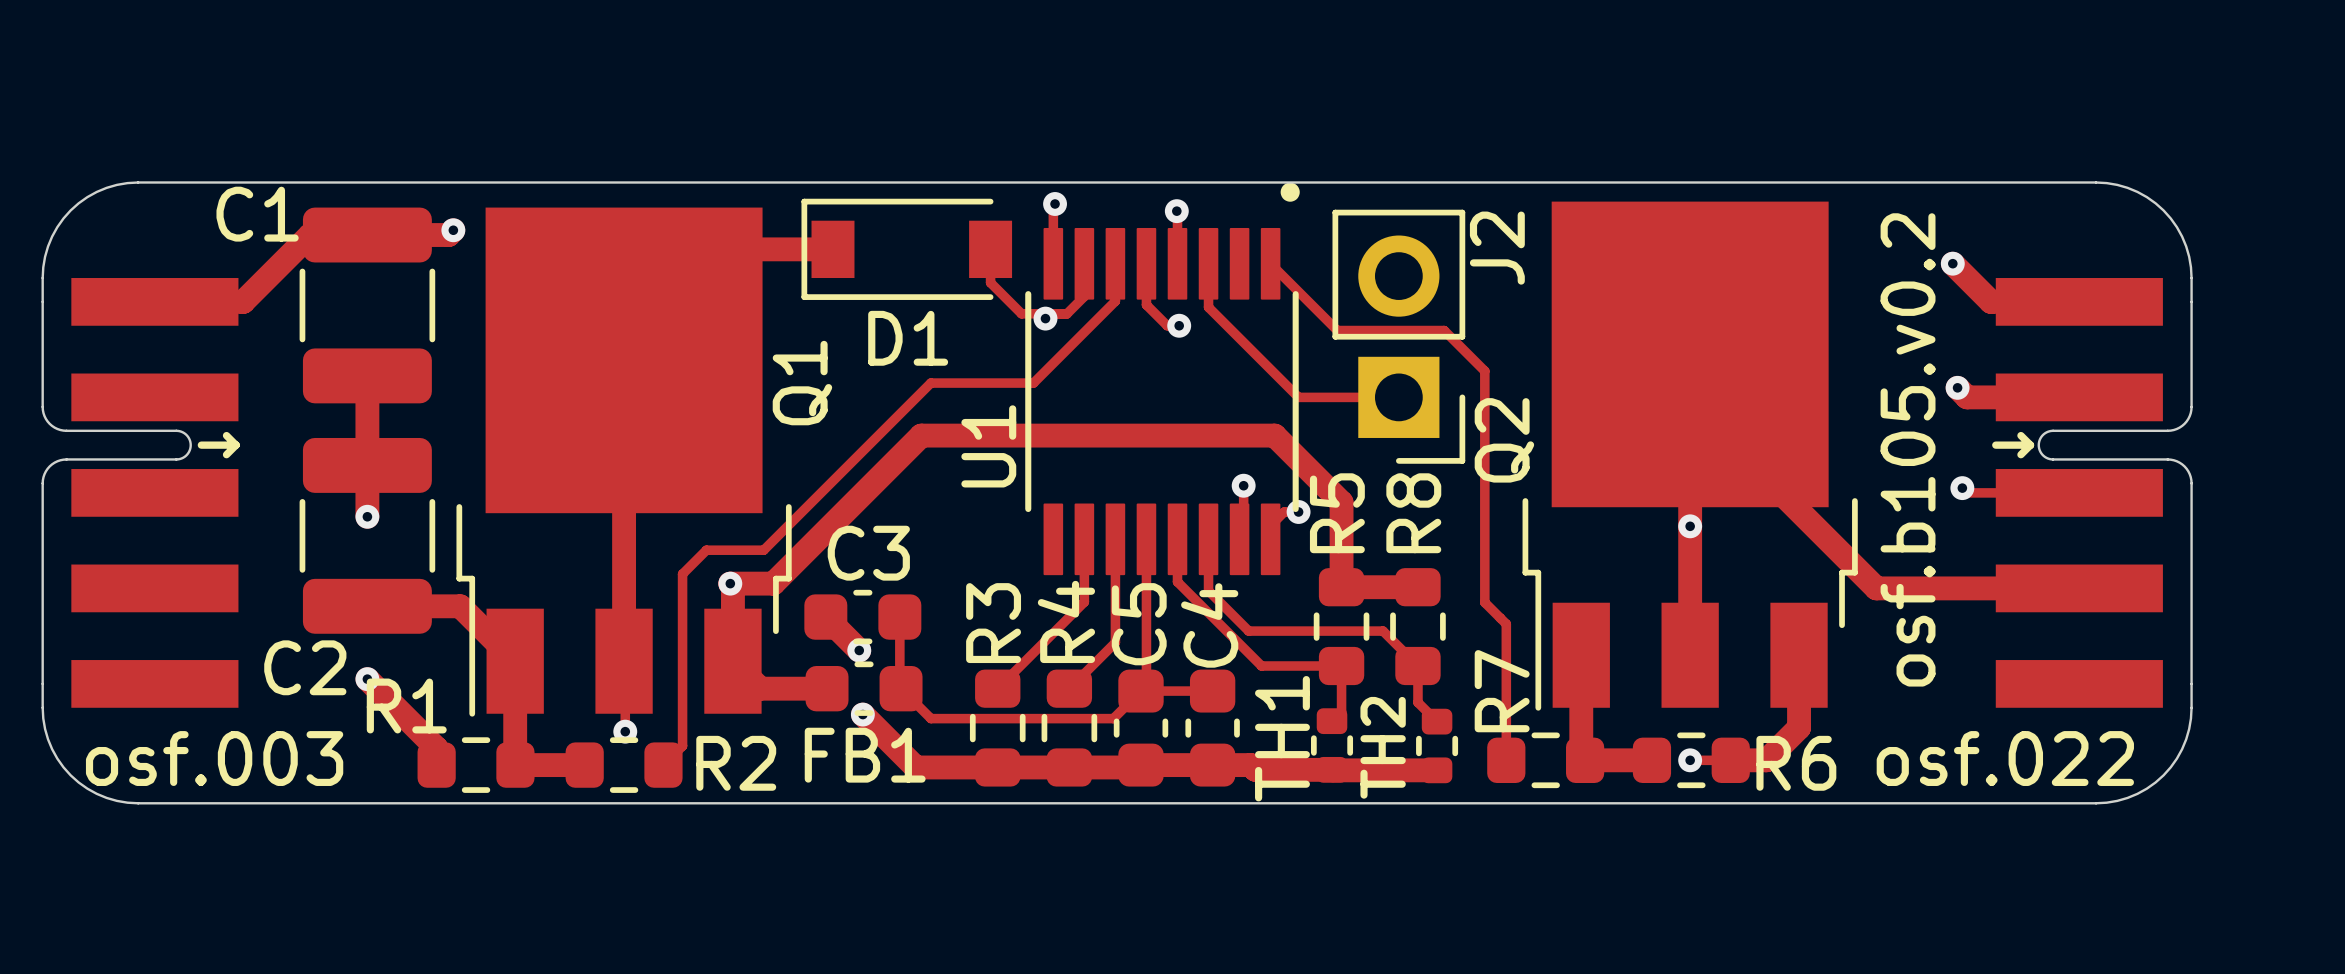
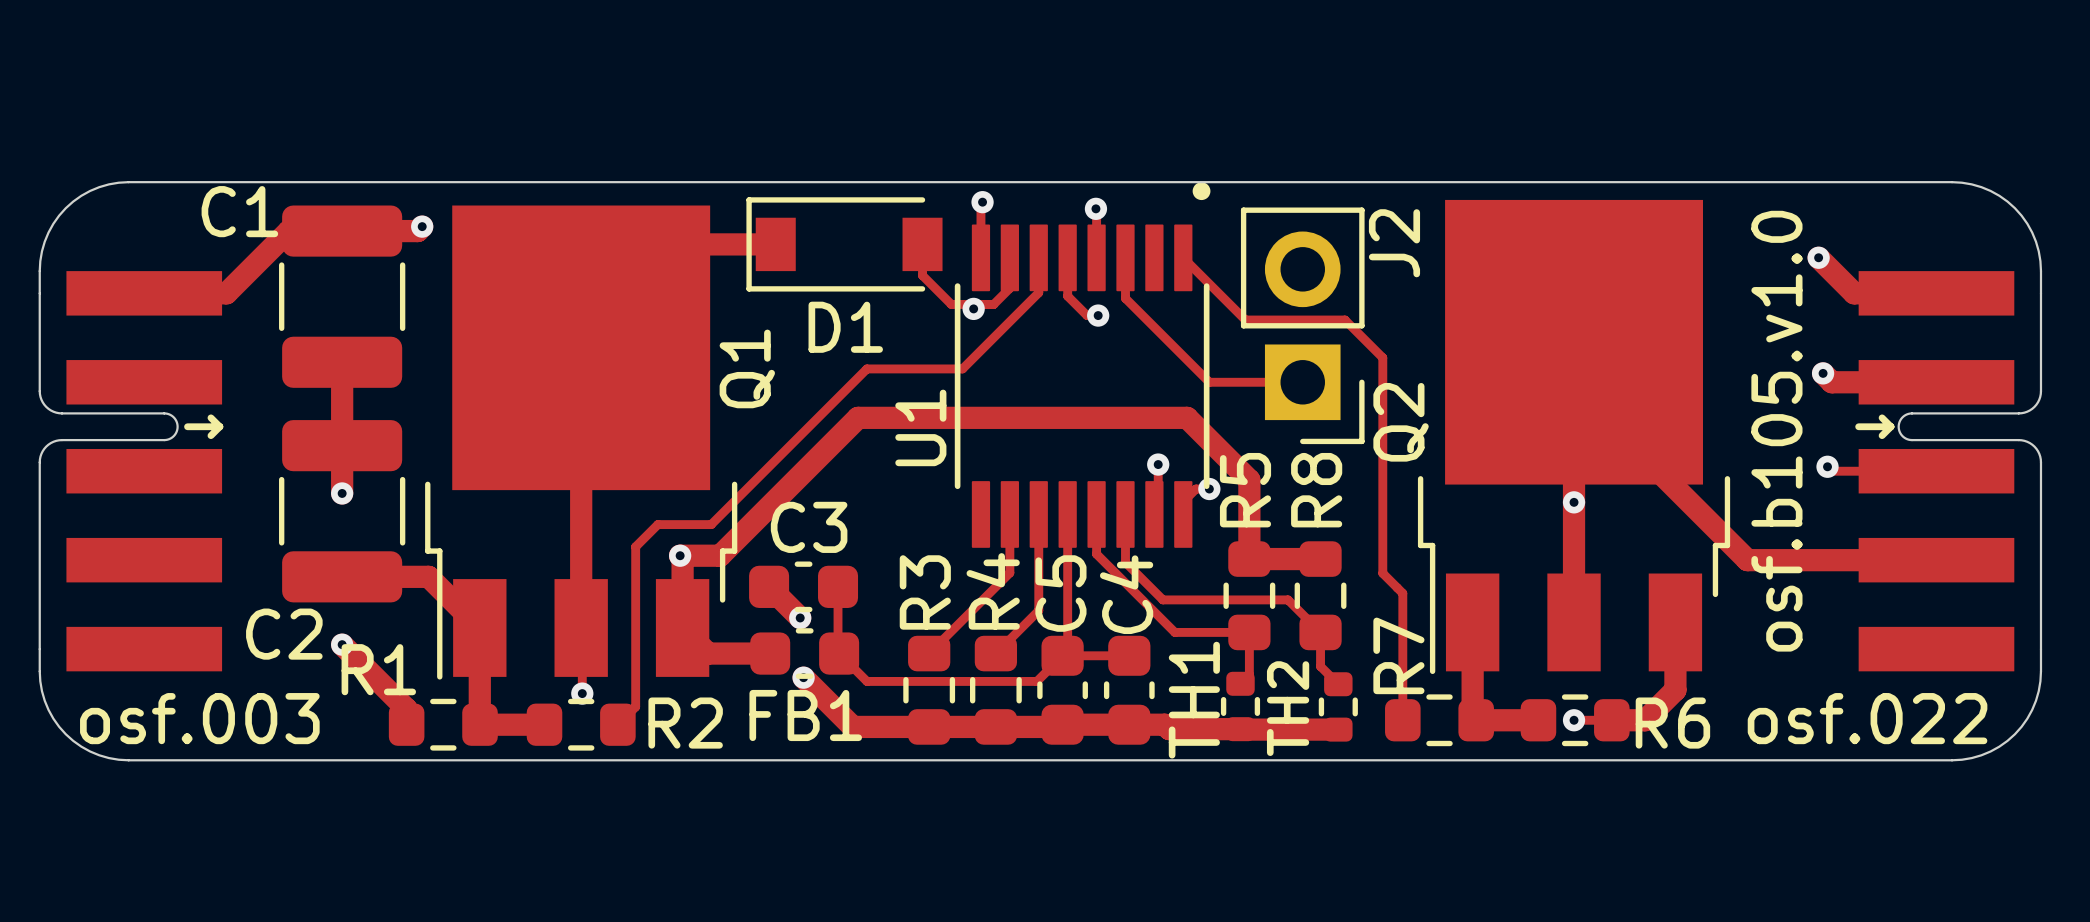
text: osf.b105.v0.2 (1908, 449) -> osf.b105.v1.0 (1776, 431)

